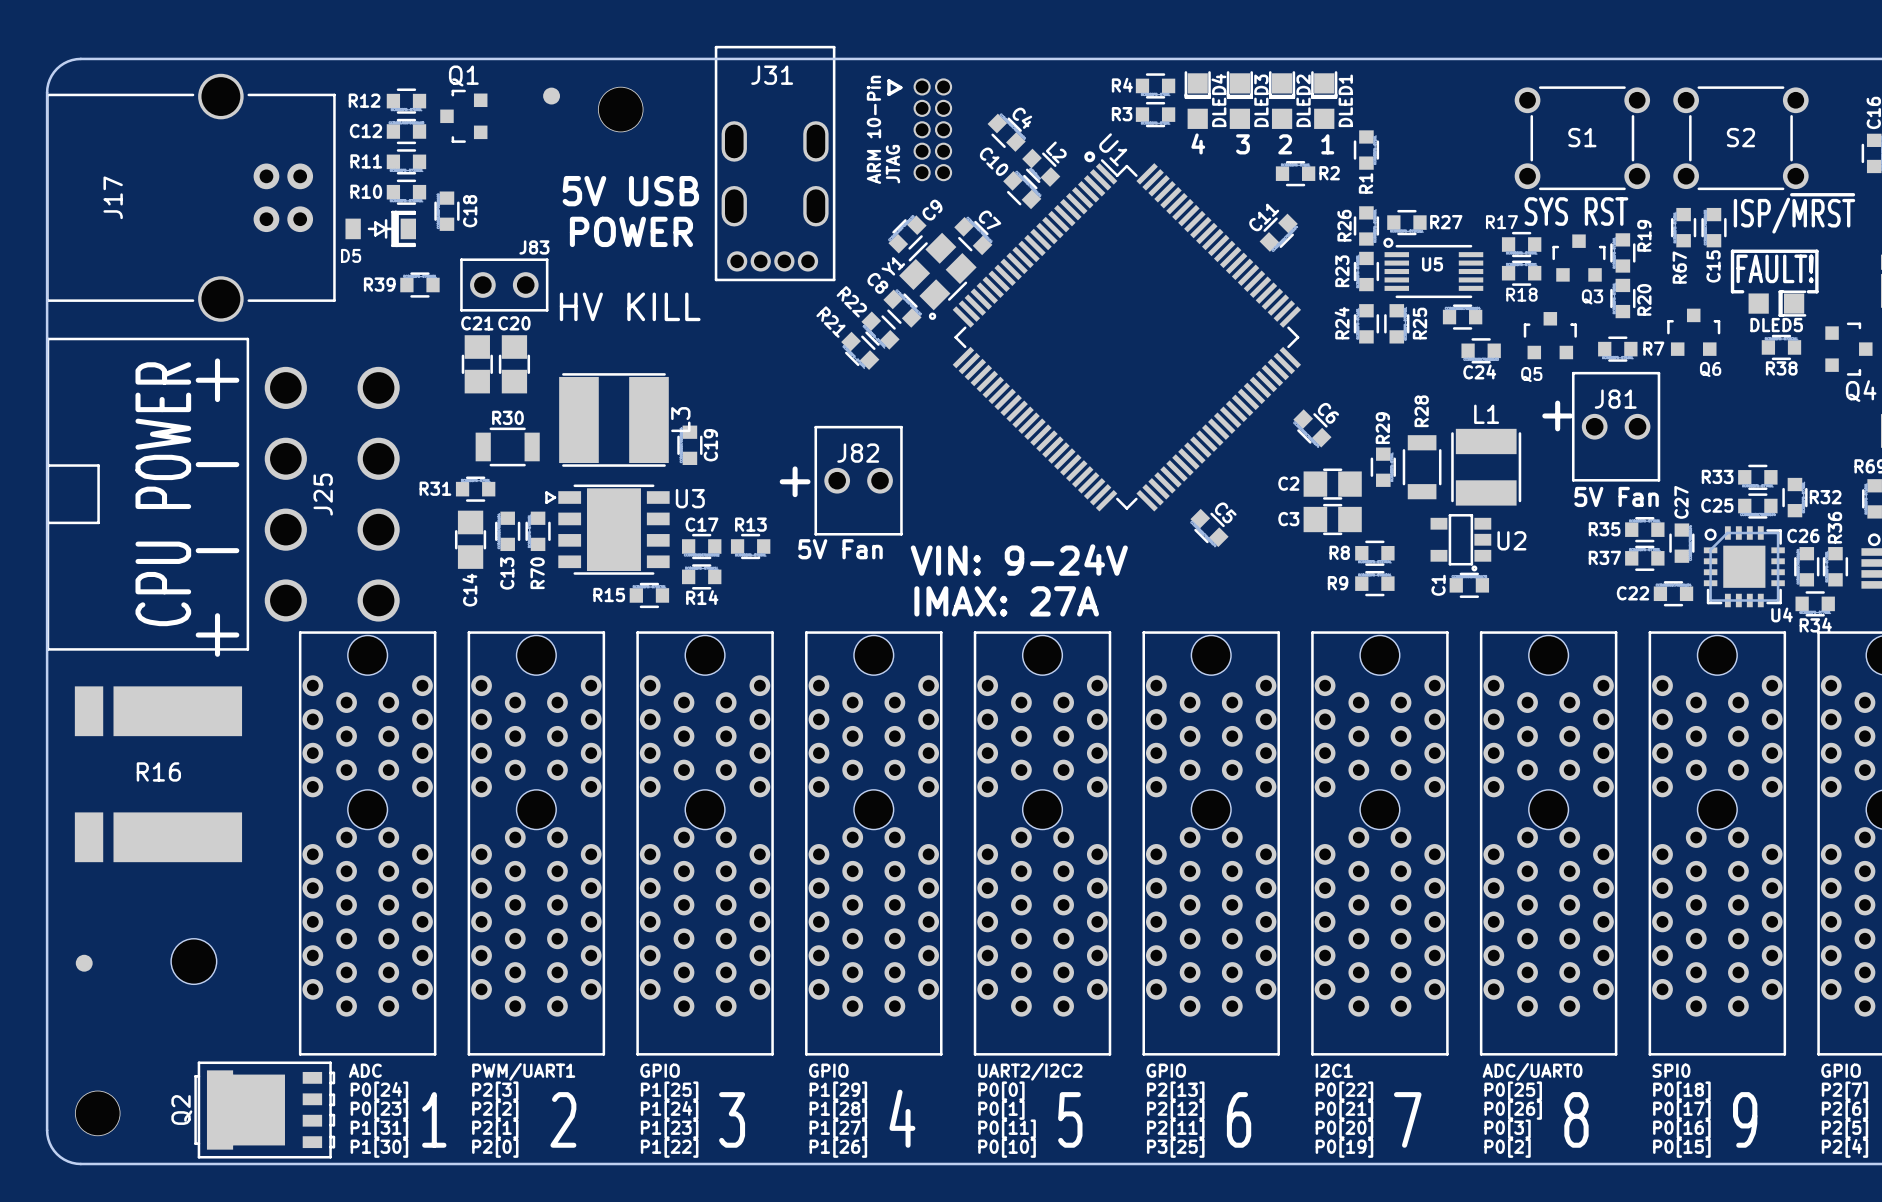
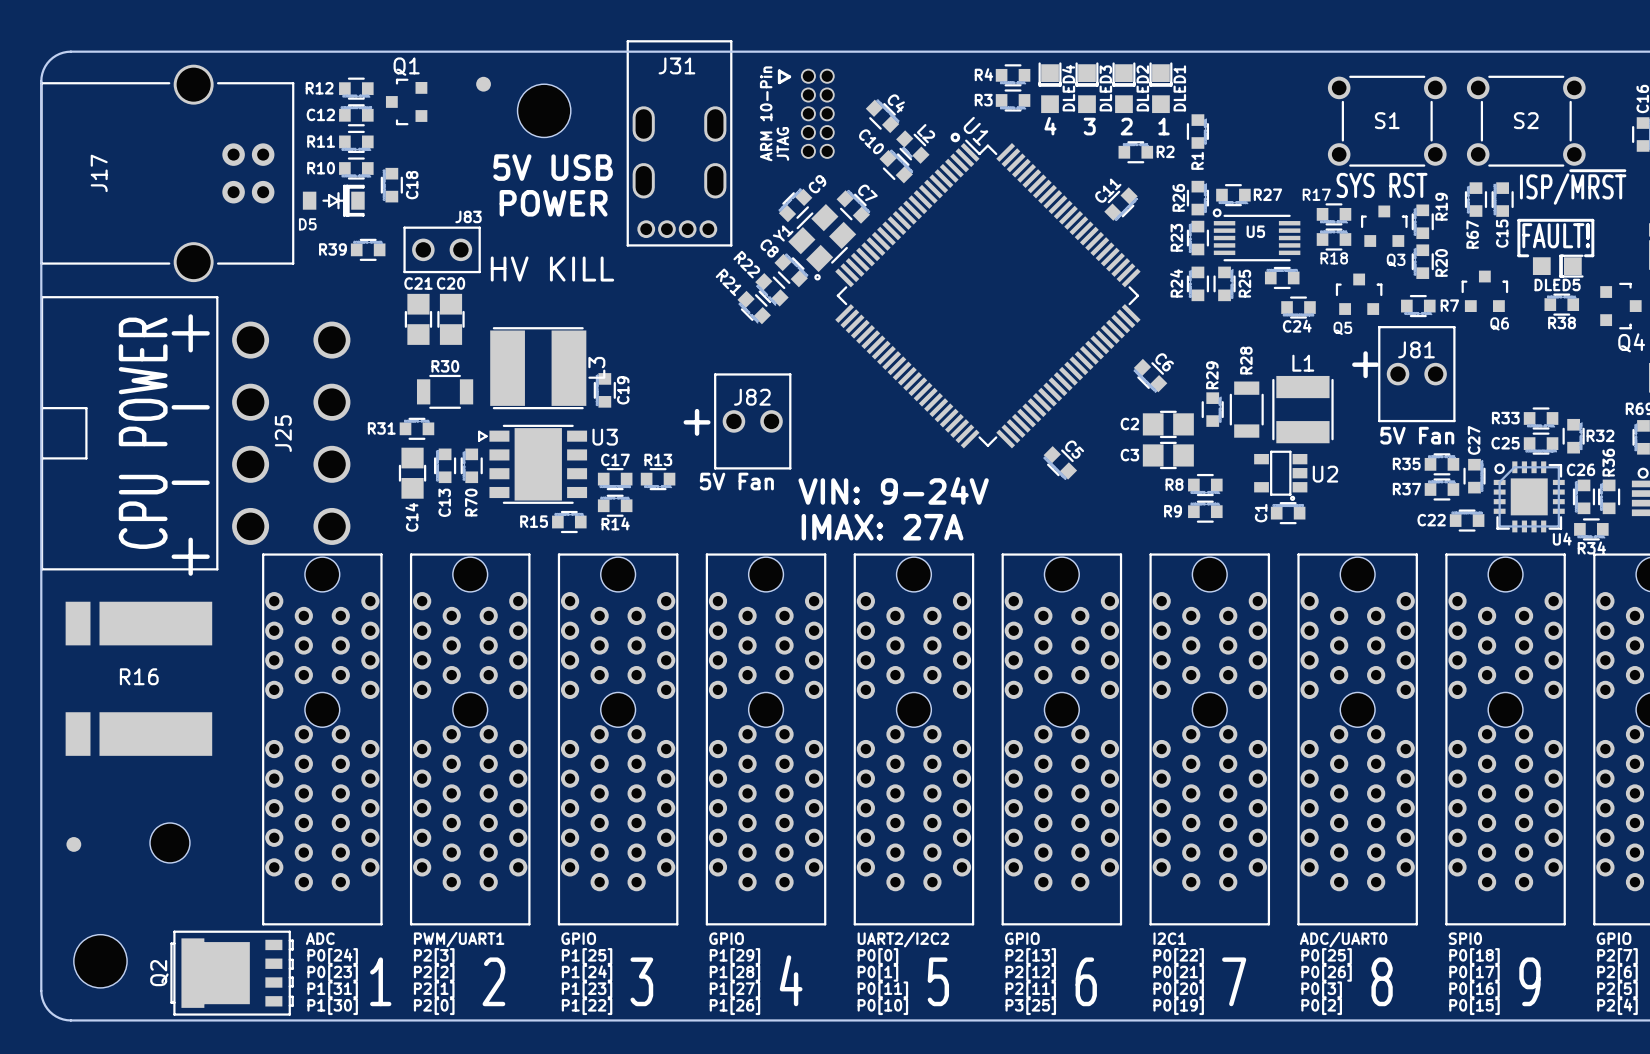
part footprint: [597, 86, 644, 133] -> [517, 84, 571, 138]
part: none -> (100, 961)
part: (97, 1113) -> none

